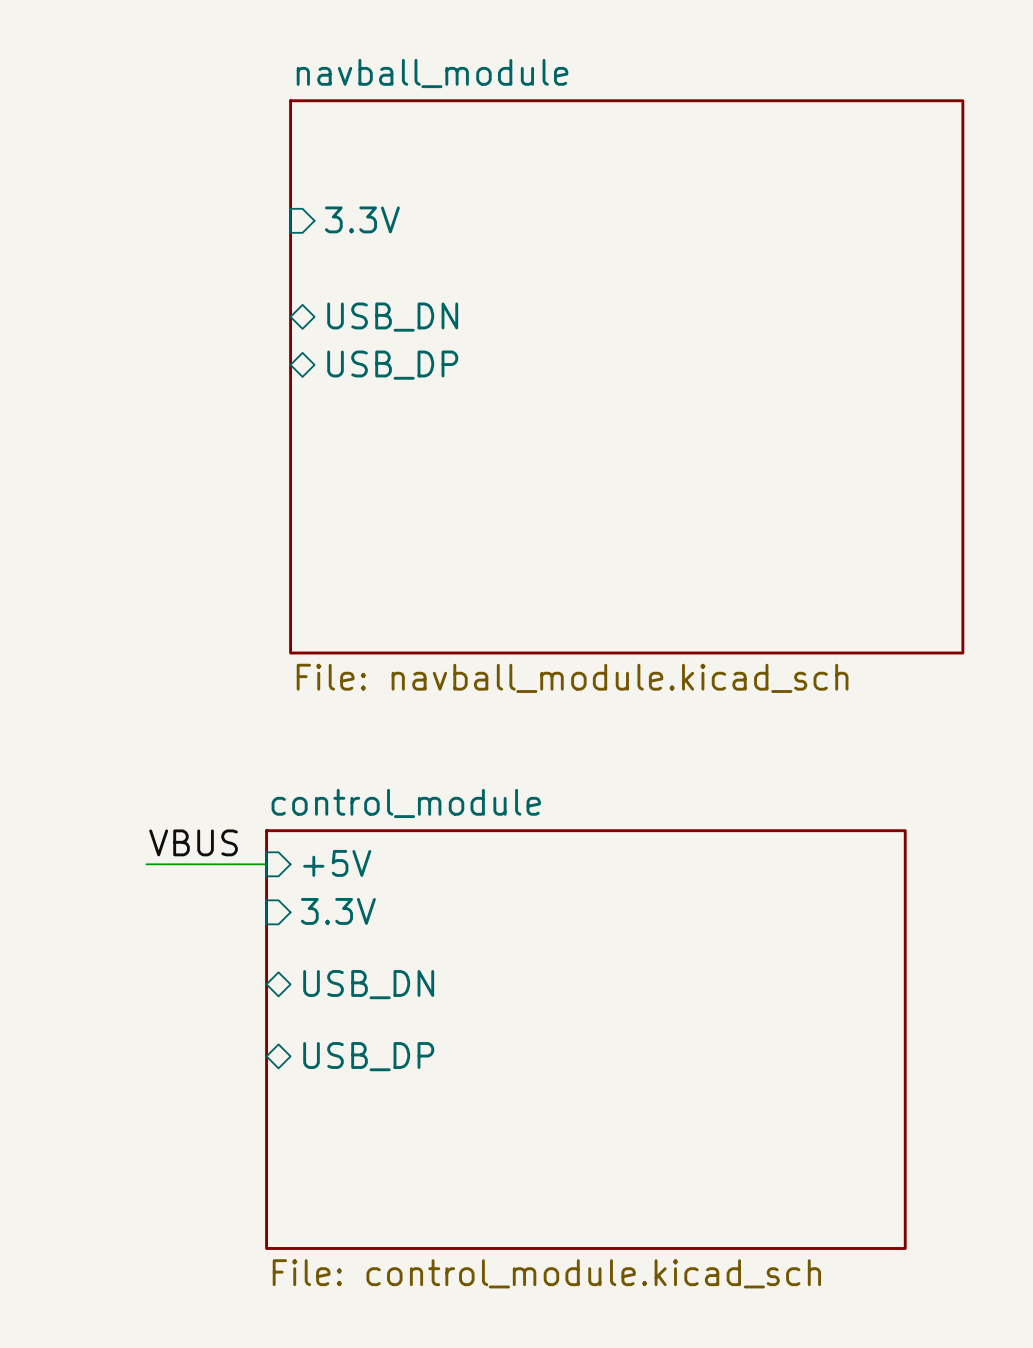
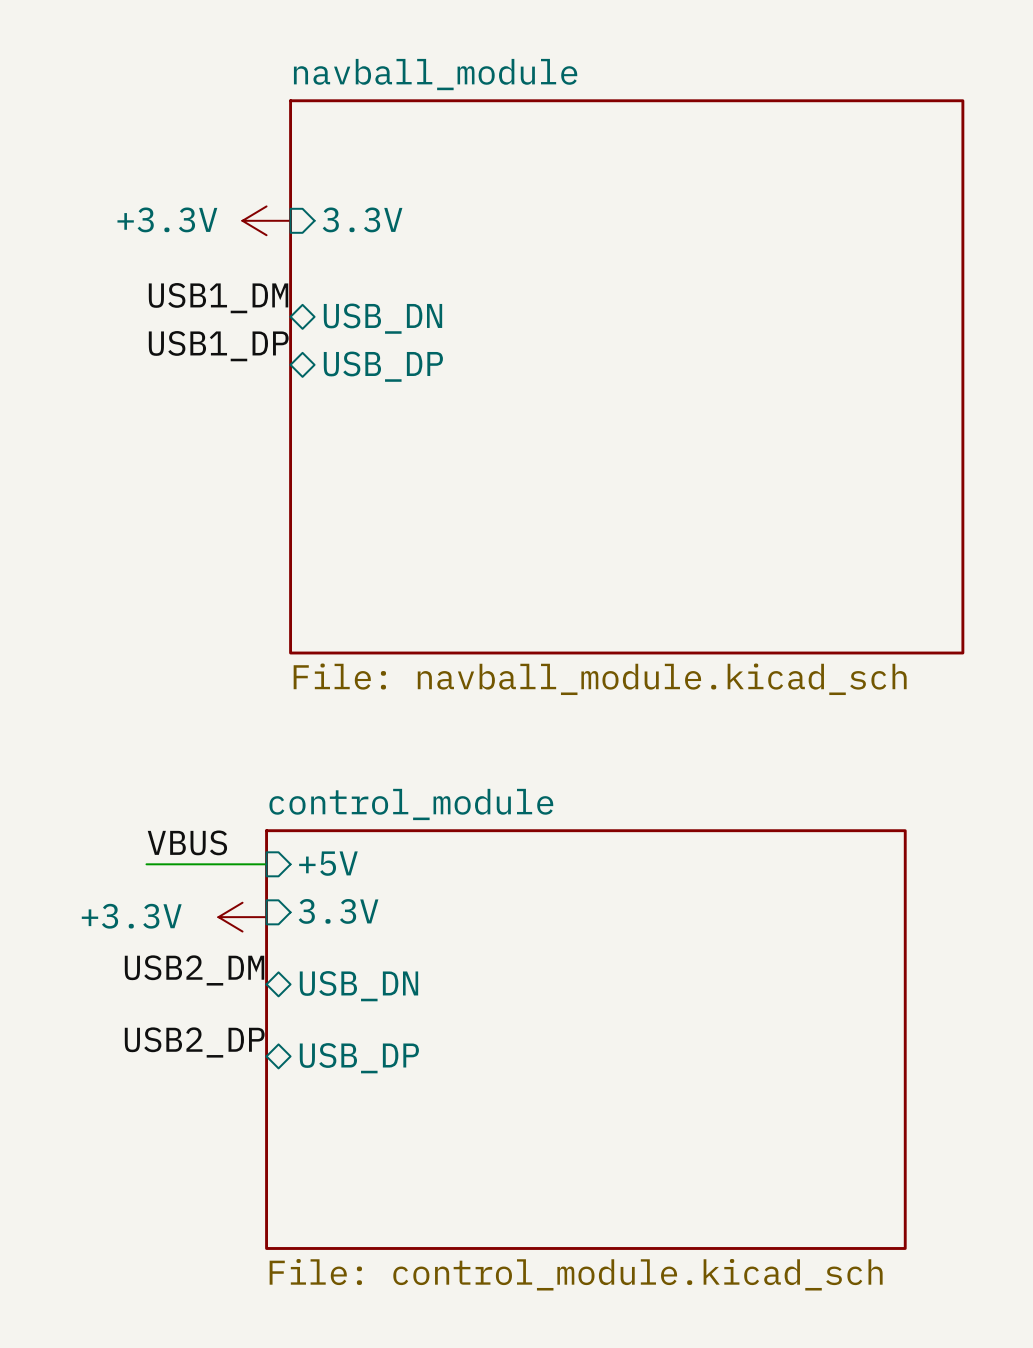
power symbol: none -> +3.3V (266, 220)
label: none -> USB1_DM (218, 298)
label: none -> USB1_DP (218, 346)
power symbol: none -> +3.3V (242, 917)
label: none -> USB2_DM (194, 970)
label: none -> USB2_DP (194, 1042)

